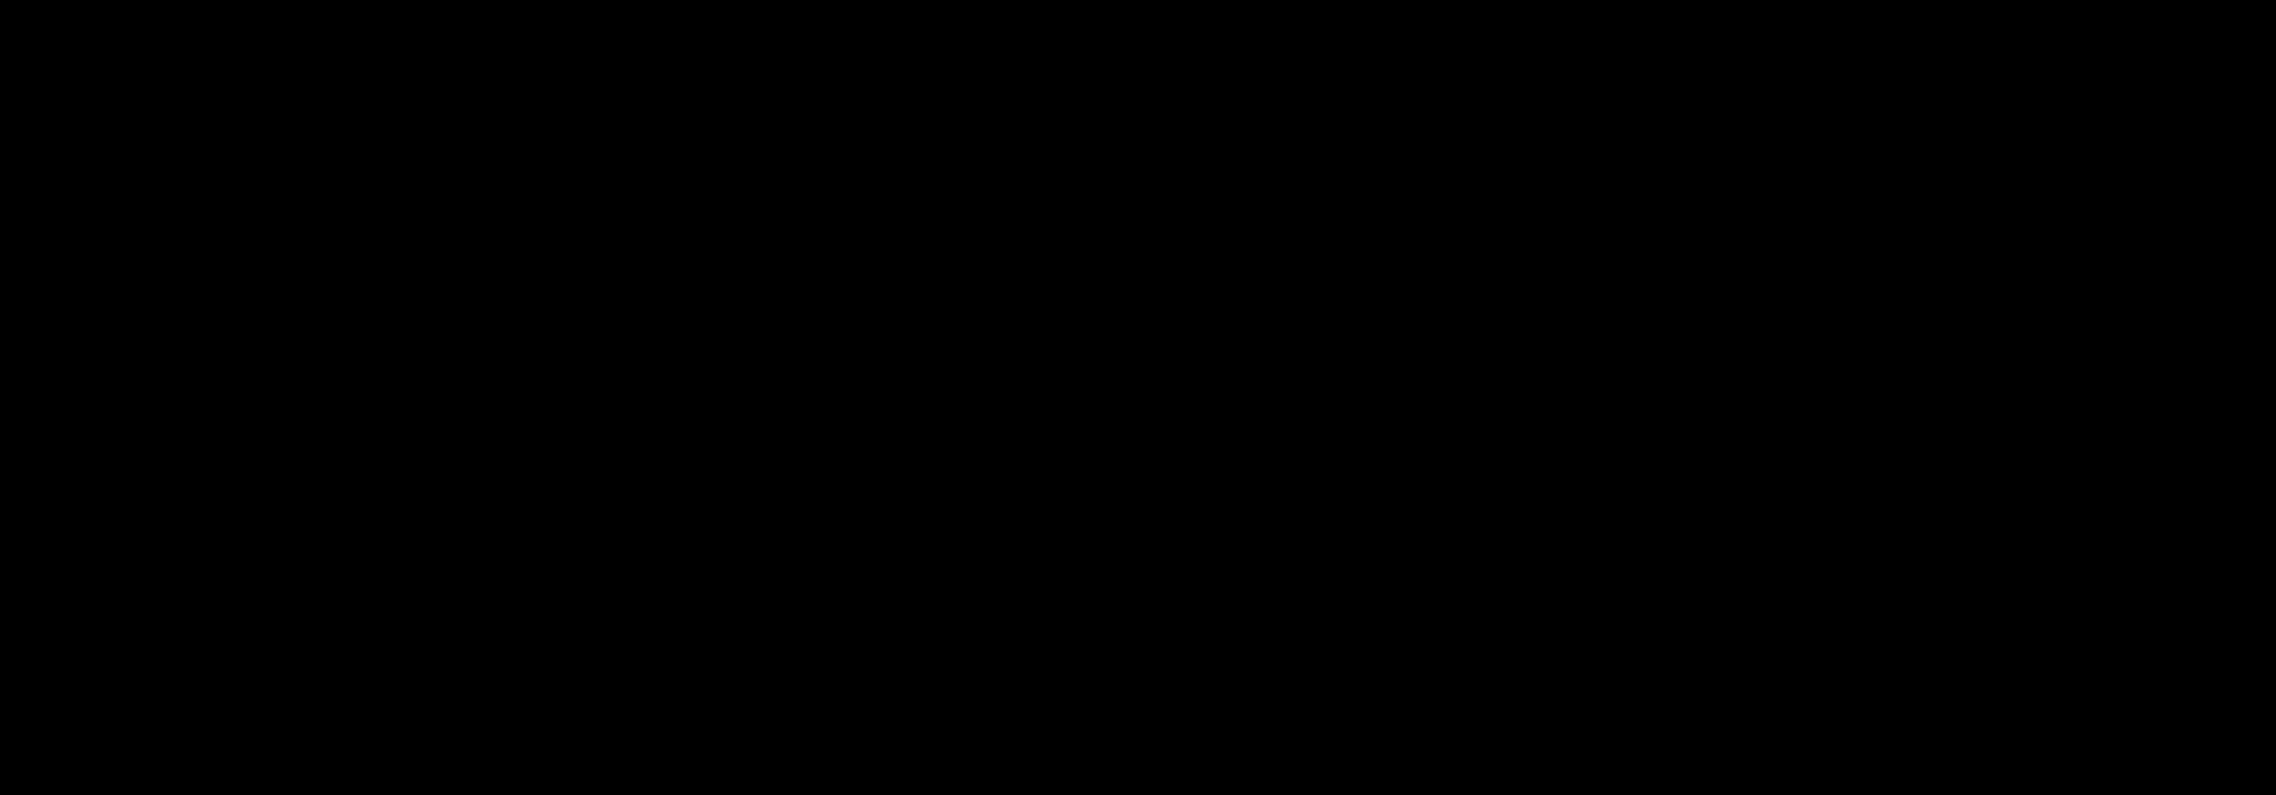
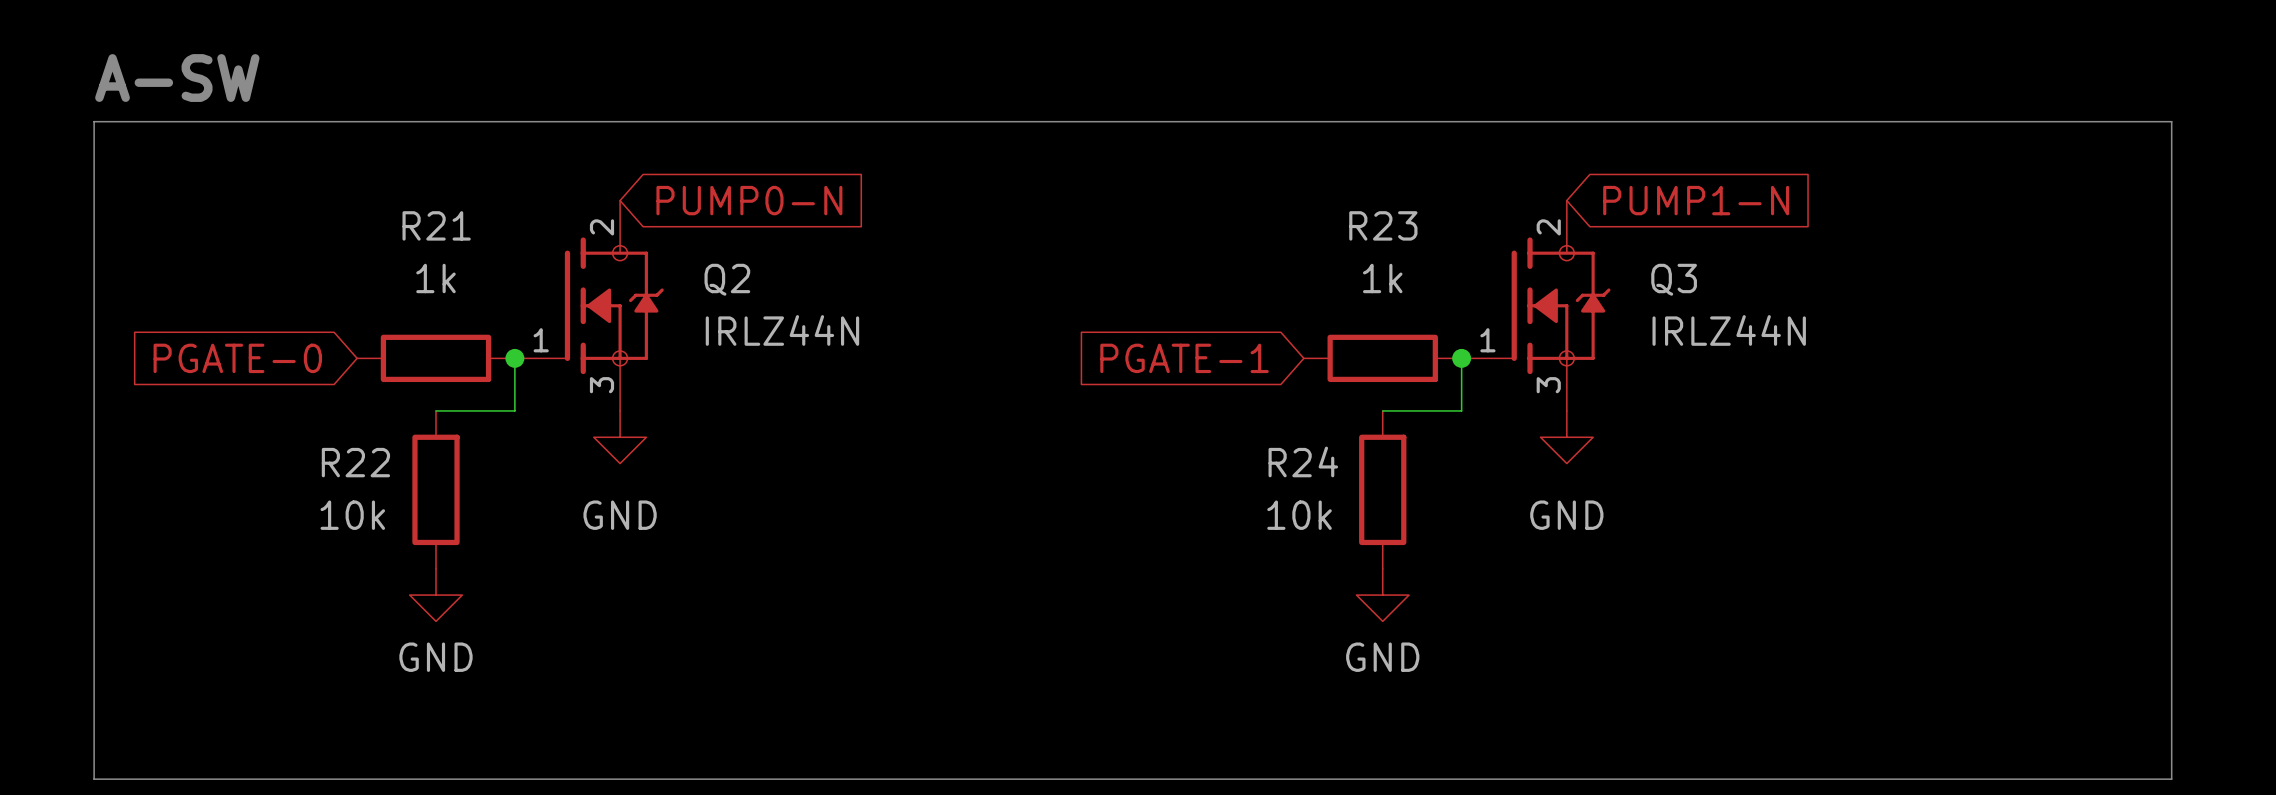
text: none -> A-SW (177, 78)
line: none -> (94, 121) (94, 779) (2171, 779) (2171, 121) (94, 121)
global label: none -> PUMP0-N (749, 200)
global label: none -> PUMP1-N (1696, 200)
Q2: none -> IRLZ44N (589, 305)
Q3: none -> IRLZ44N (1536, 305)
global label: none -> PGATE-0 (237, 358)
R21: none -> 1k (435, 358)
wire: none -> (514, 358) (514, 410) (435, 410)
junction: none -> (514, 358)
global label: none -> PGATE-1 (1184, 358)
R23: none -> 1k (1382, 358)
wire: none -> (1461, 358) (1461, 410) (1382, 410)
junction: none -> (1461, 358)
power symbol: none -> GND (620, 437)
power symbol: none -> GND (1566, 437)
R22: none -> 10k (435, 489)
R24: none -> 10k (1382, 489)
power symbol: none -> GND (435, 595)
power symbol: none -> GND (1382, 595)

